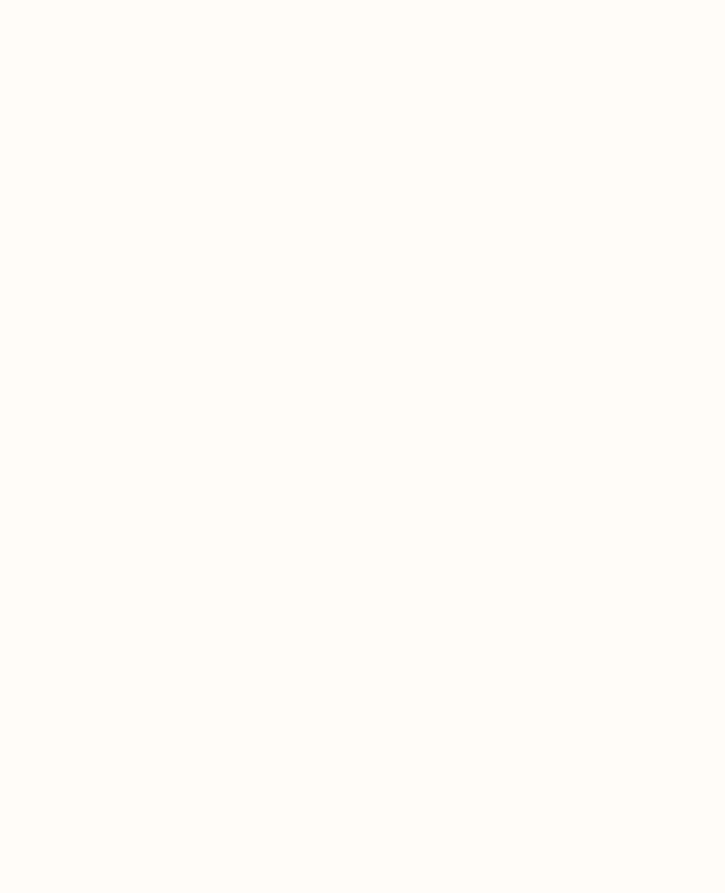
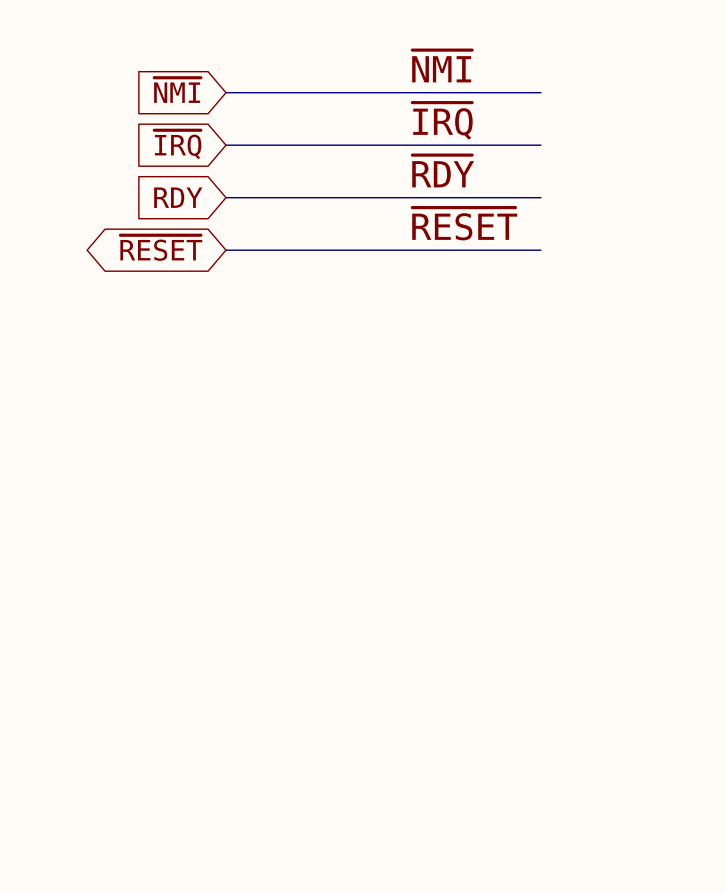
label: none -> ~{NMI} (442, 66)
global label: none -> ~{NMI} (177, 90)
wire: none -> (225, 92) (540, 92)
label: none -> ~{IRQ} (442, 121)
global label: none -> ~{IRQ} (177, 144)
wire: none -> (225, 145) (540, 145)
label: none -> ~{RDY} (443, 171)
global label: none -> RDY (178, 197)
wire: none -> (225, 197) (540, 197)
label: none -> ~{RESET} (464, 224)
global label: none -> ~{RESET} (161, 248)
wire: none -> (225, 250) (540, 250)

